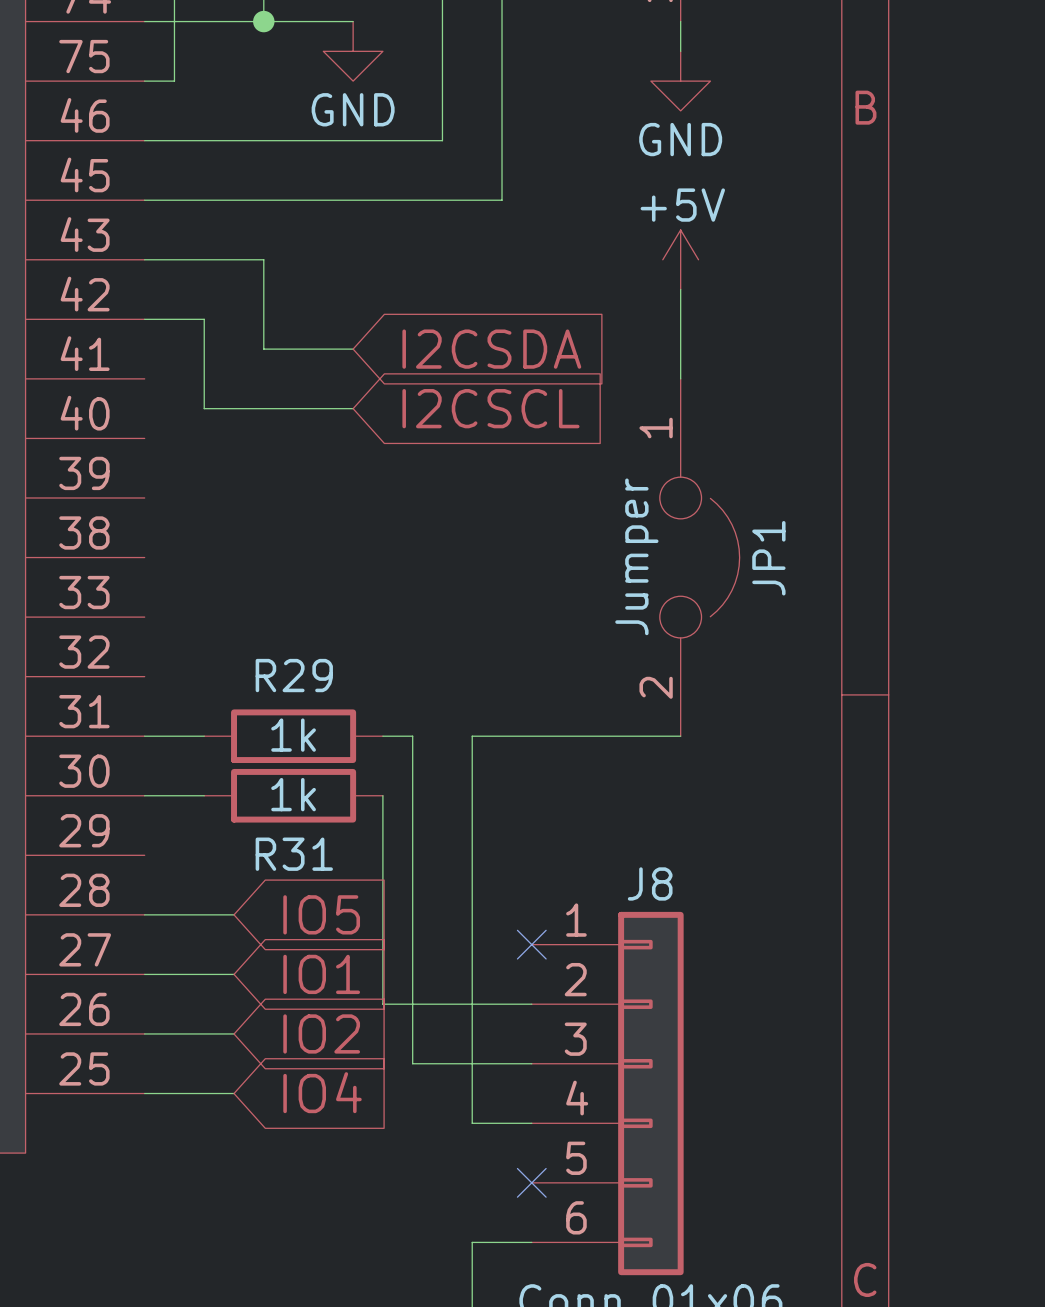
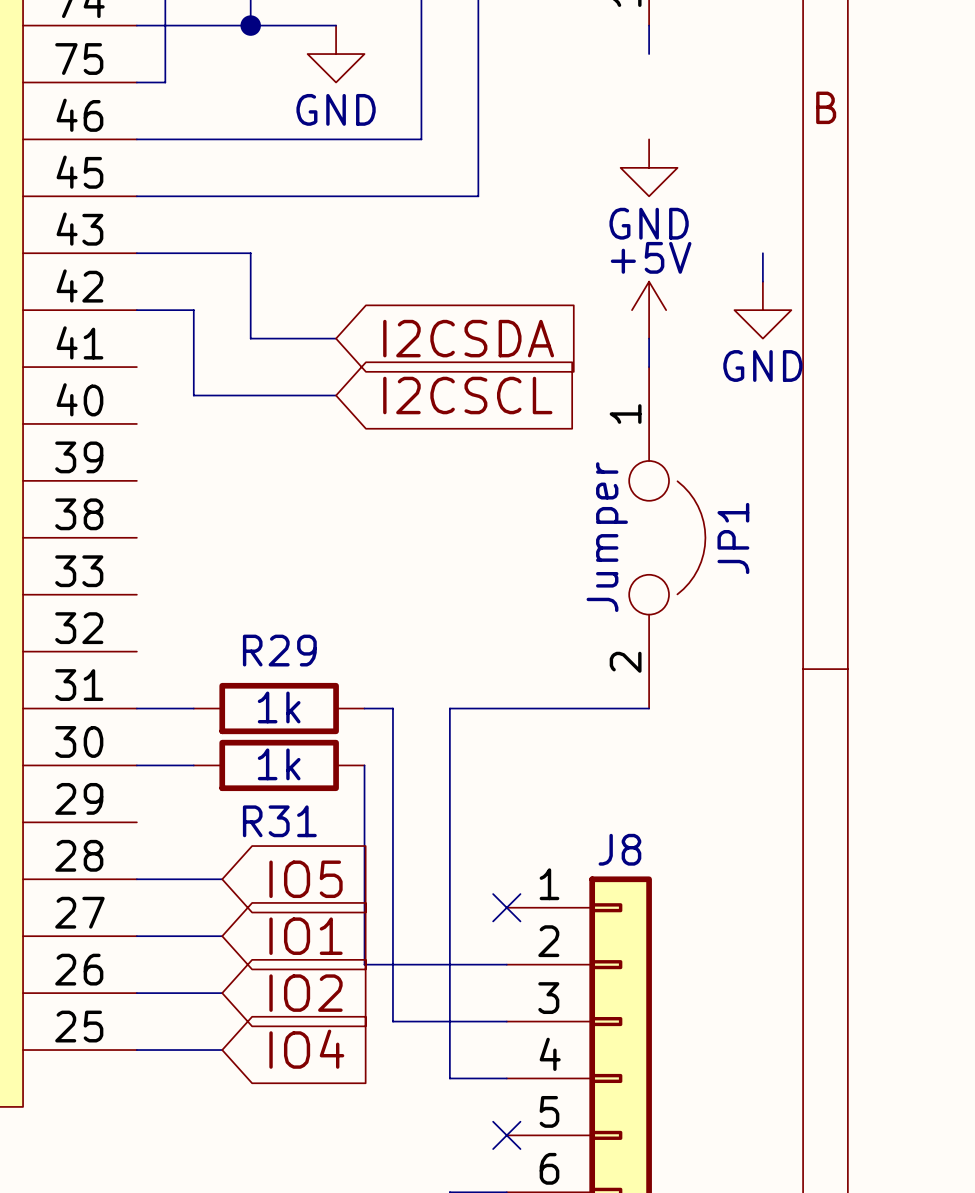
power symbol position: GND (680, 81) -> GND (649, 167)
power symbol position: +5V (680, 259) -> +5V (649, 310)
wire: none -> (762, 253) (762, 281)
power symbol: none -> GND (762, 310)

